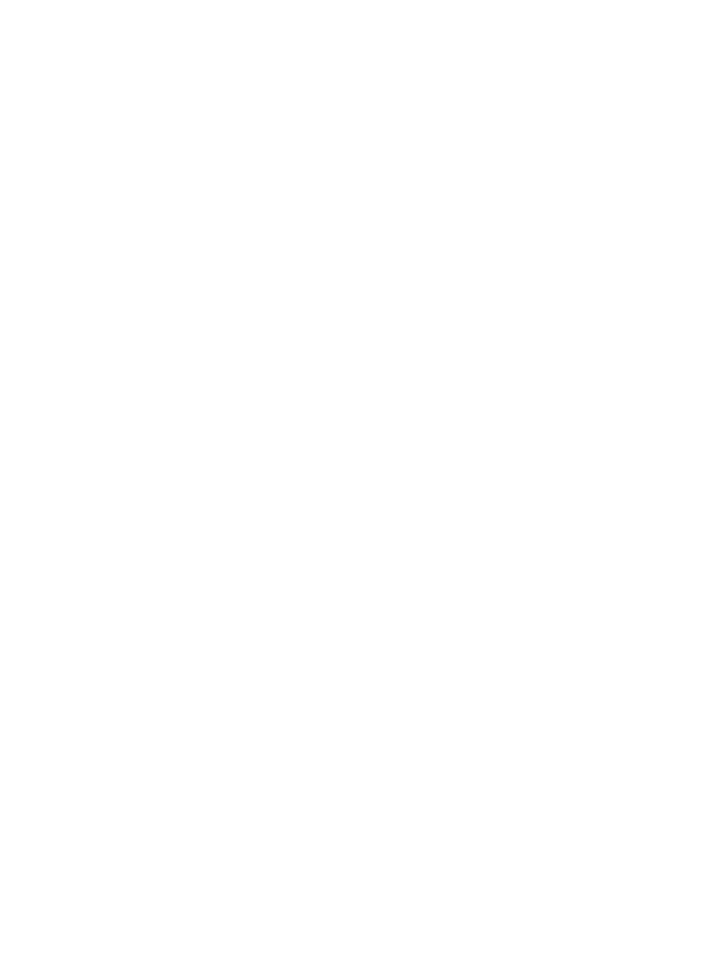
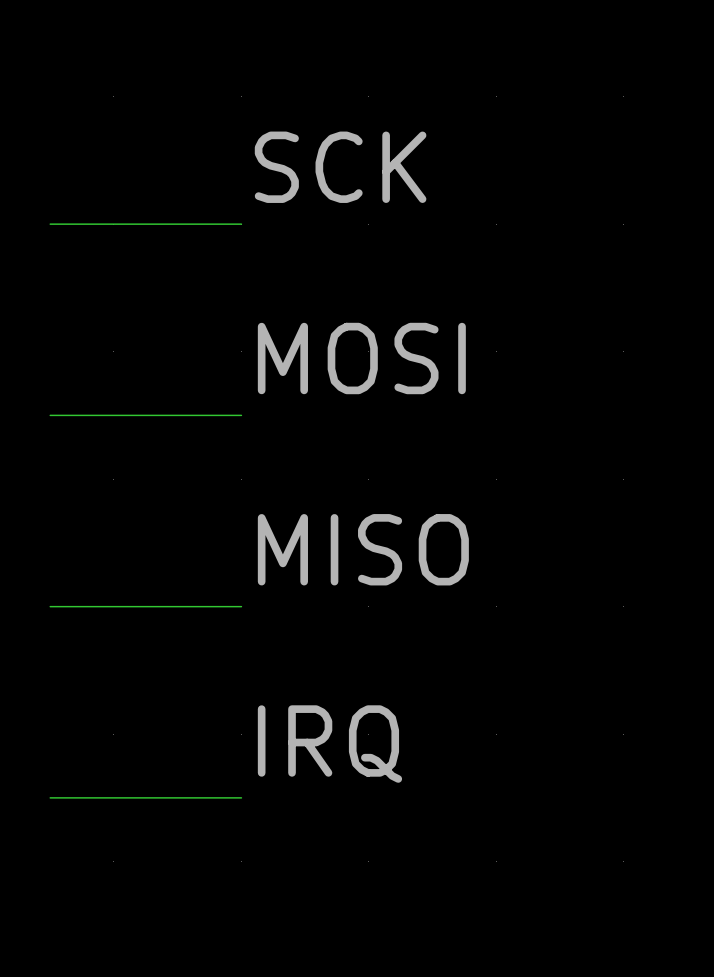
label: none -> SCK (340, 167)
wire: none -> (50, 224) (241, 224)
label: none -> MOSI (361, 358)
wire: none -> (50, 415) (241, 415)
label: none -> MISO (363, 549)
wire: none -> (50, 606) (241, 606)
label: none -> IRQ (329, 744)
wire: none -> (50, 797) (241, 797)

